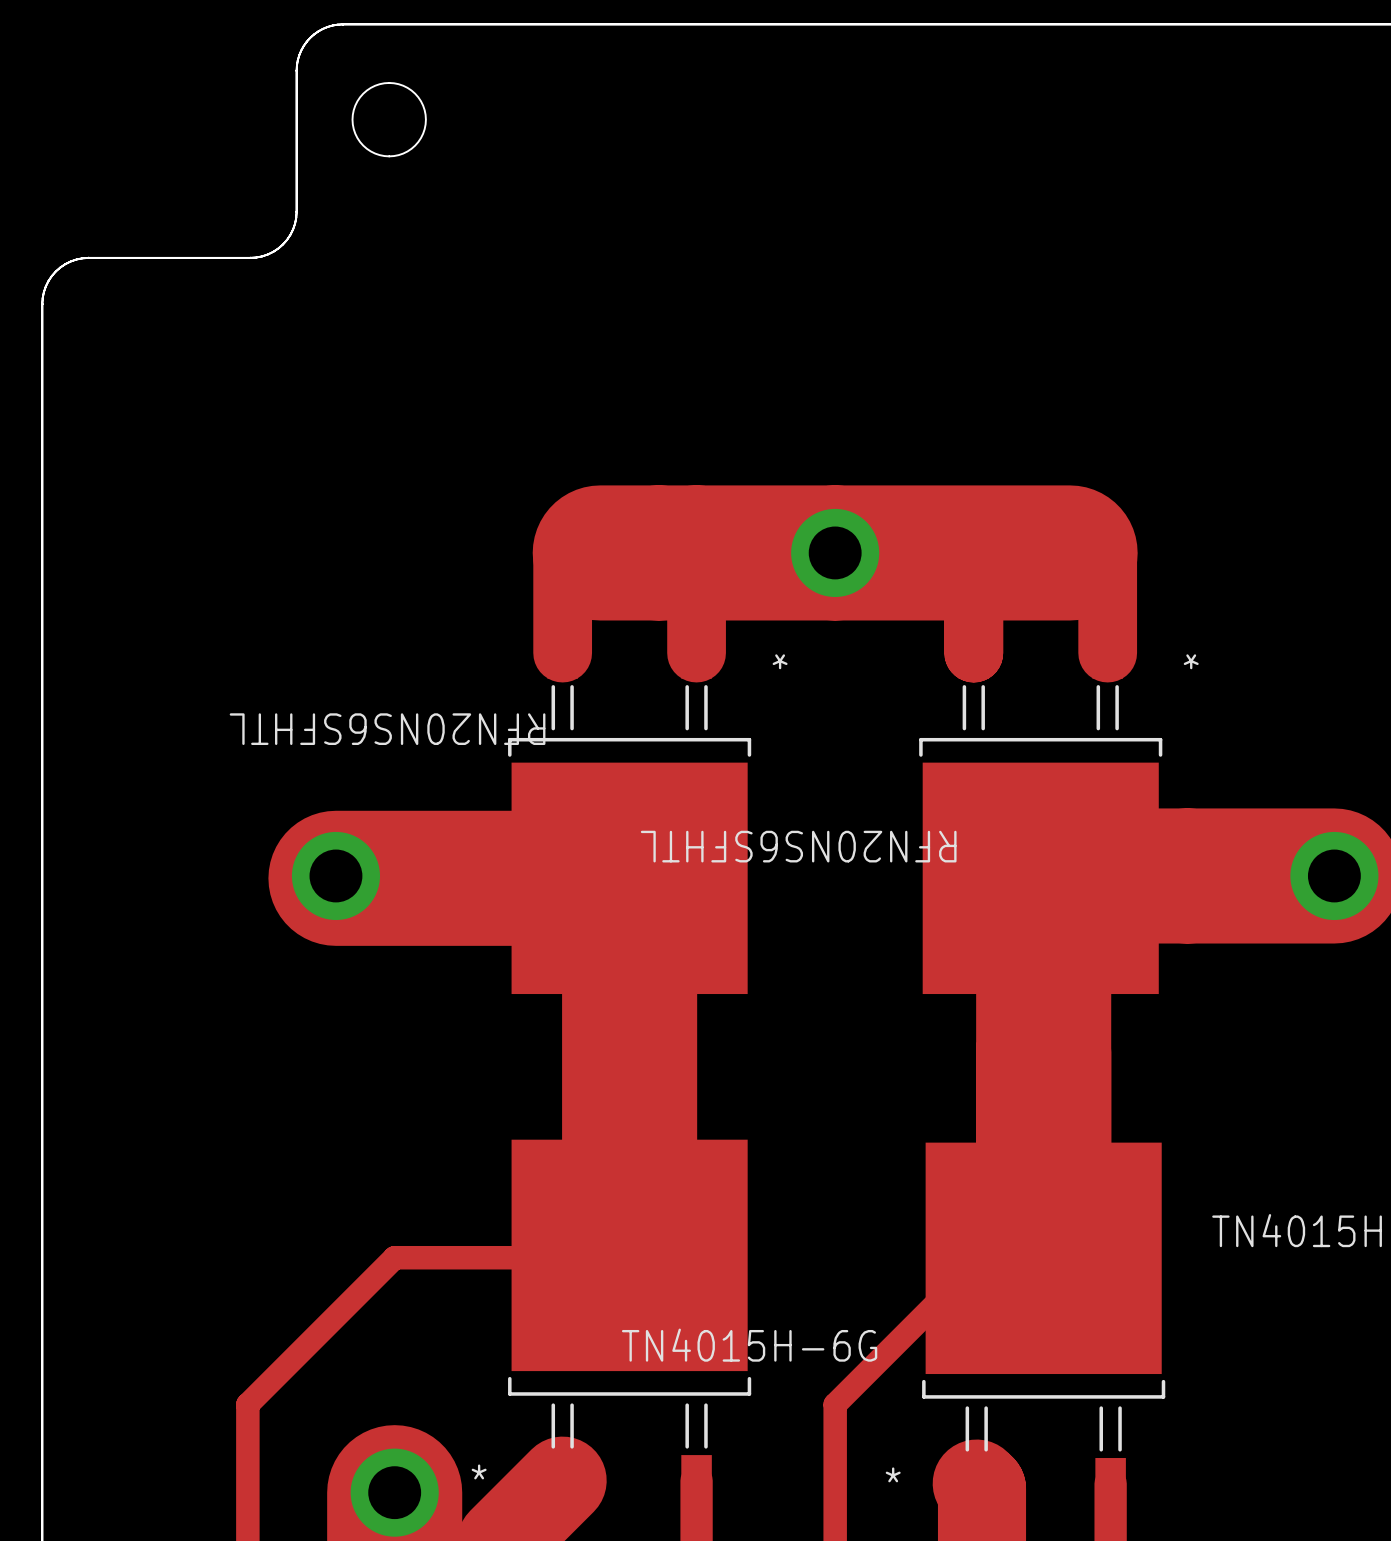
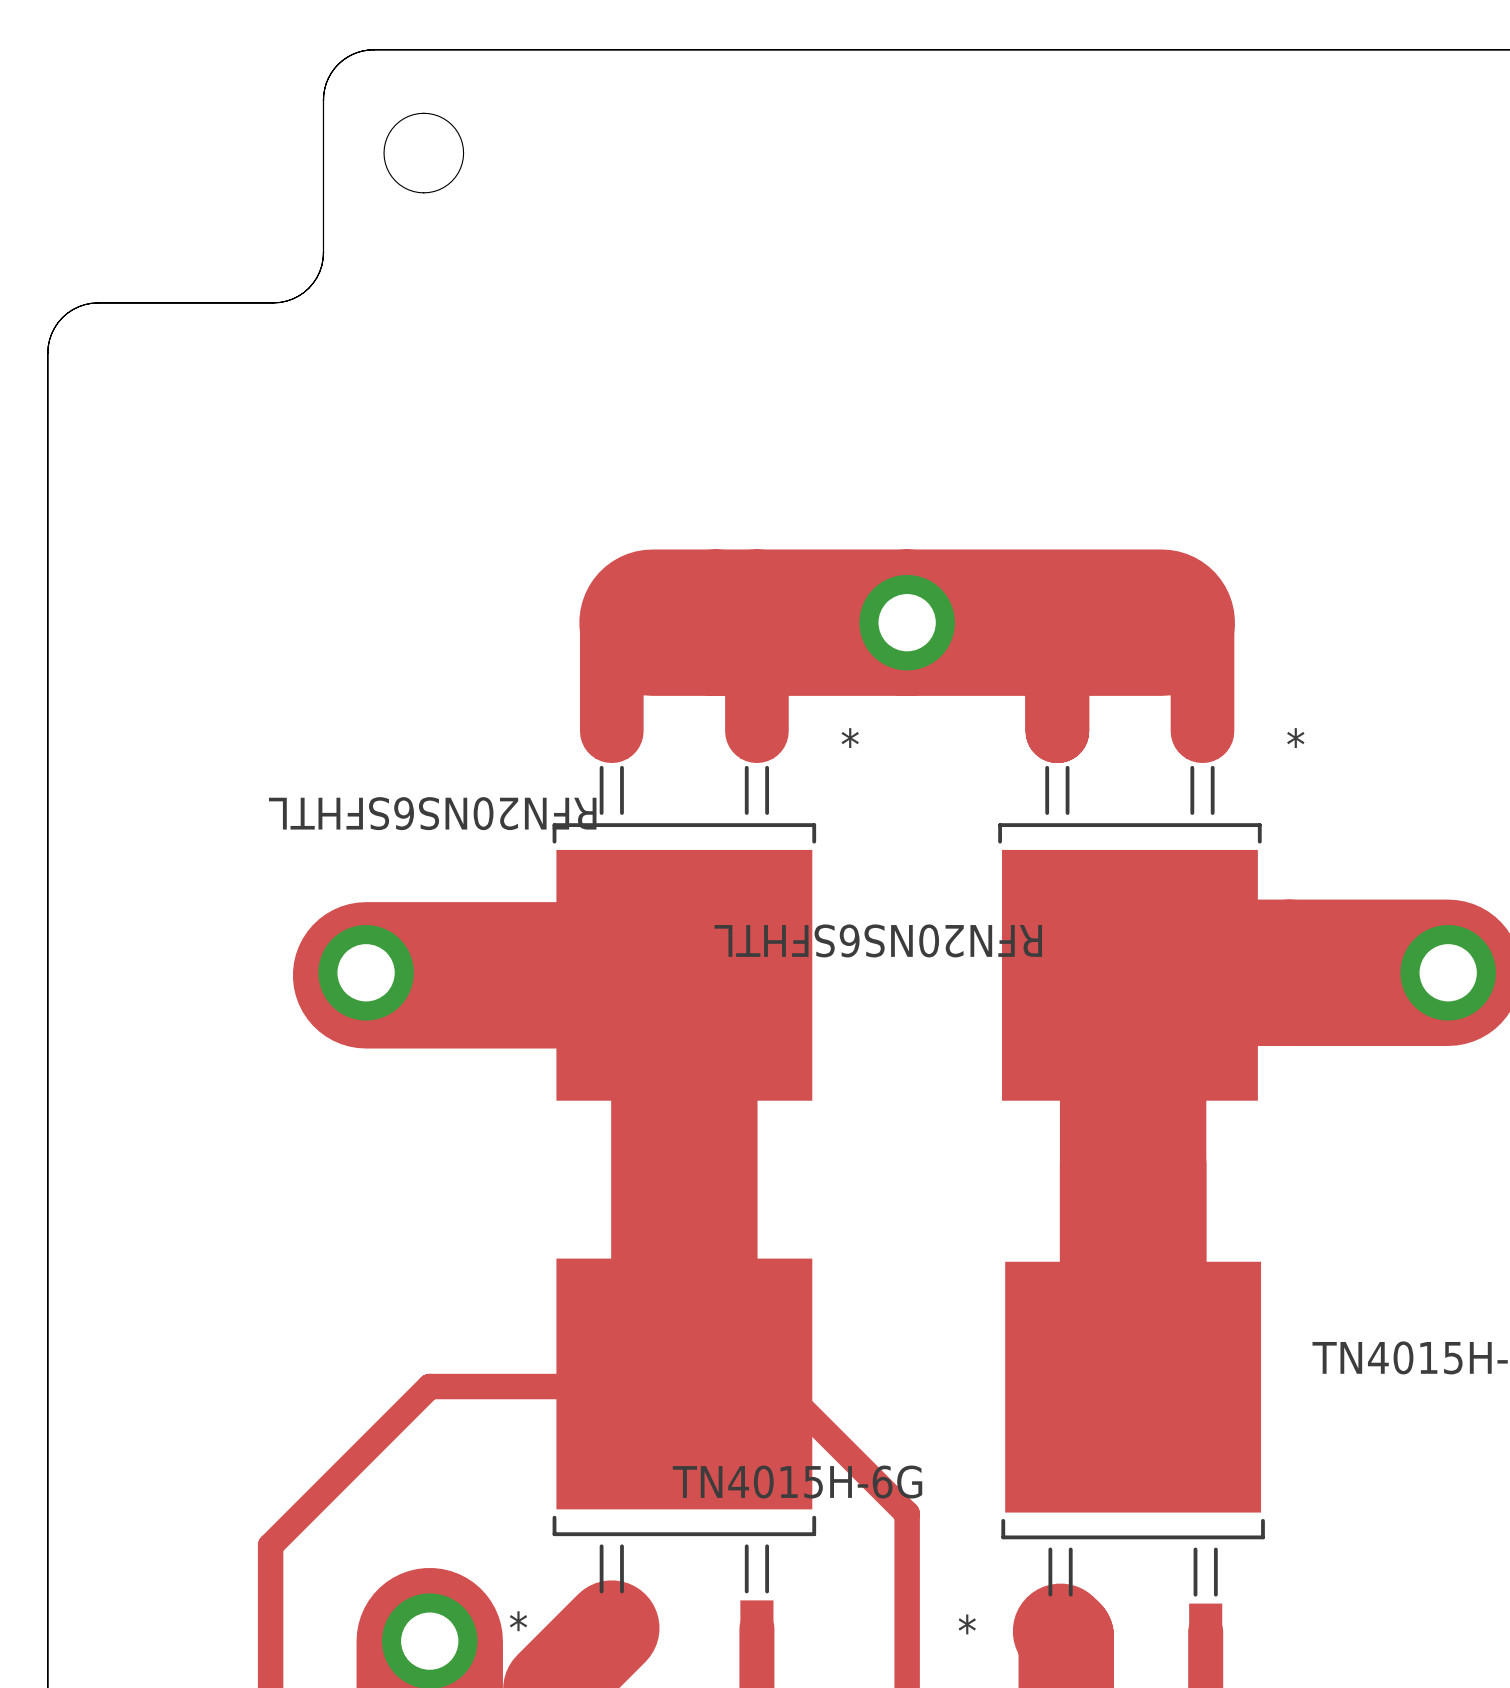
top track: (1043, 1258) (981, 1258) (835, 1404) -> (777, 1383) (907, 1513) (907, 1545)

